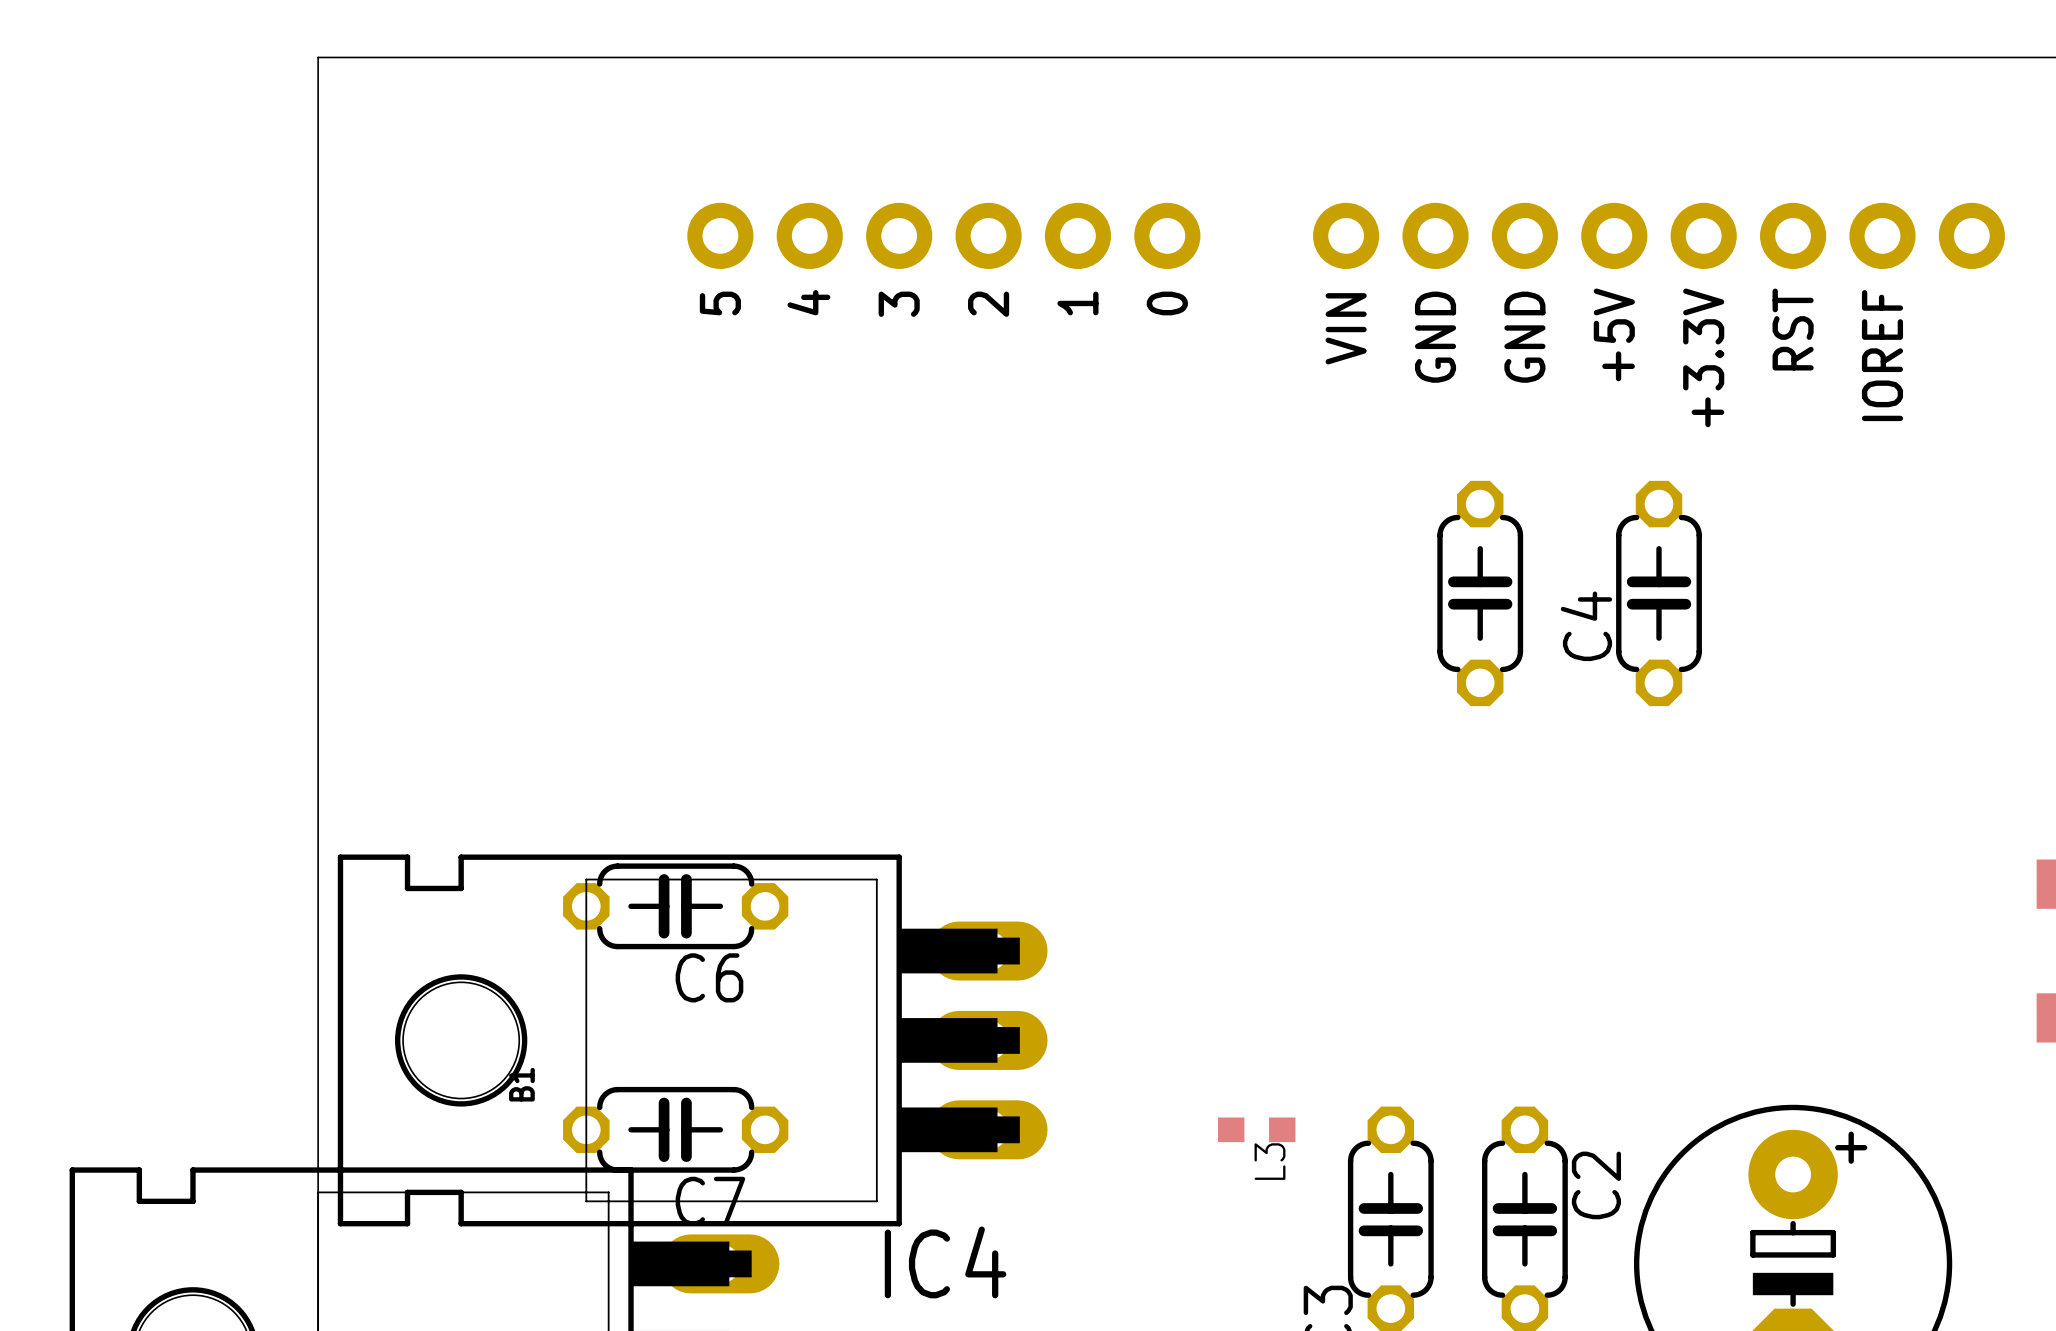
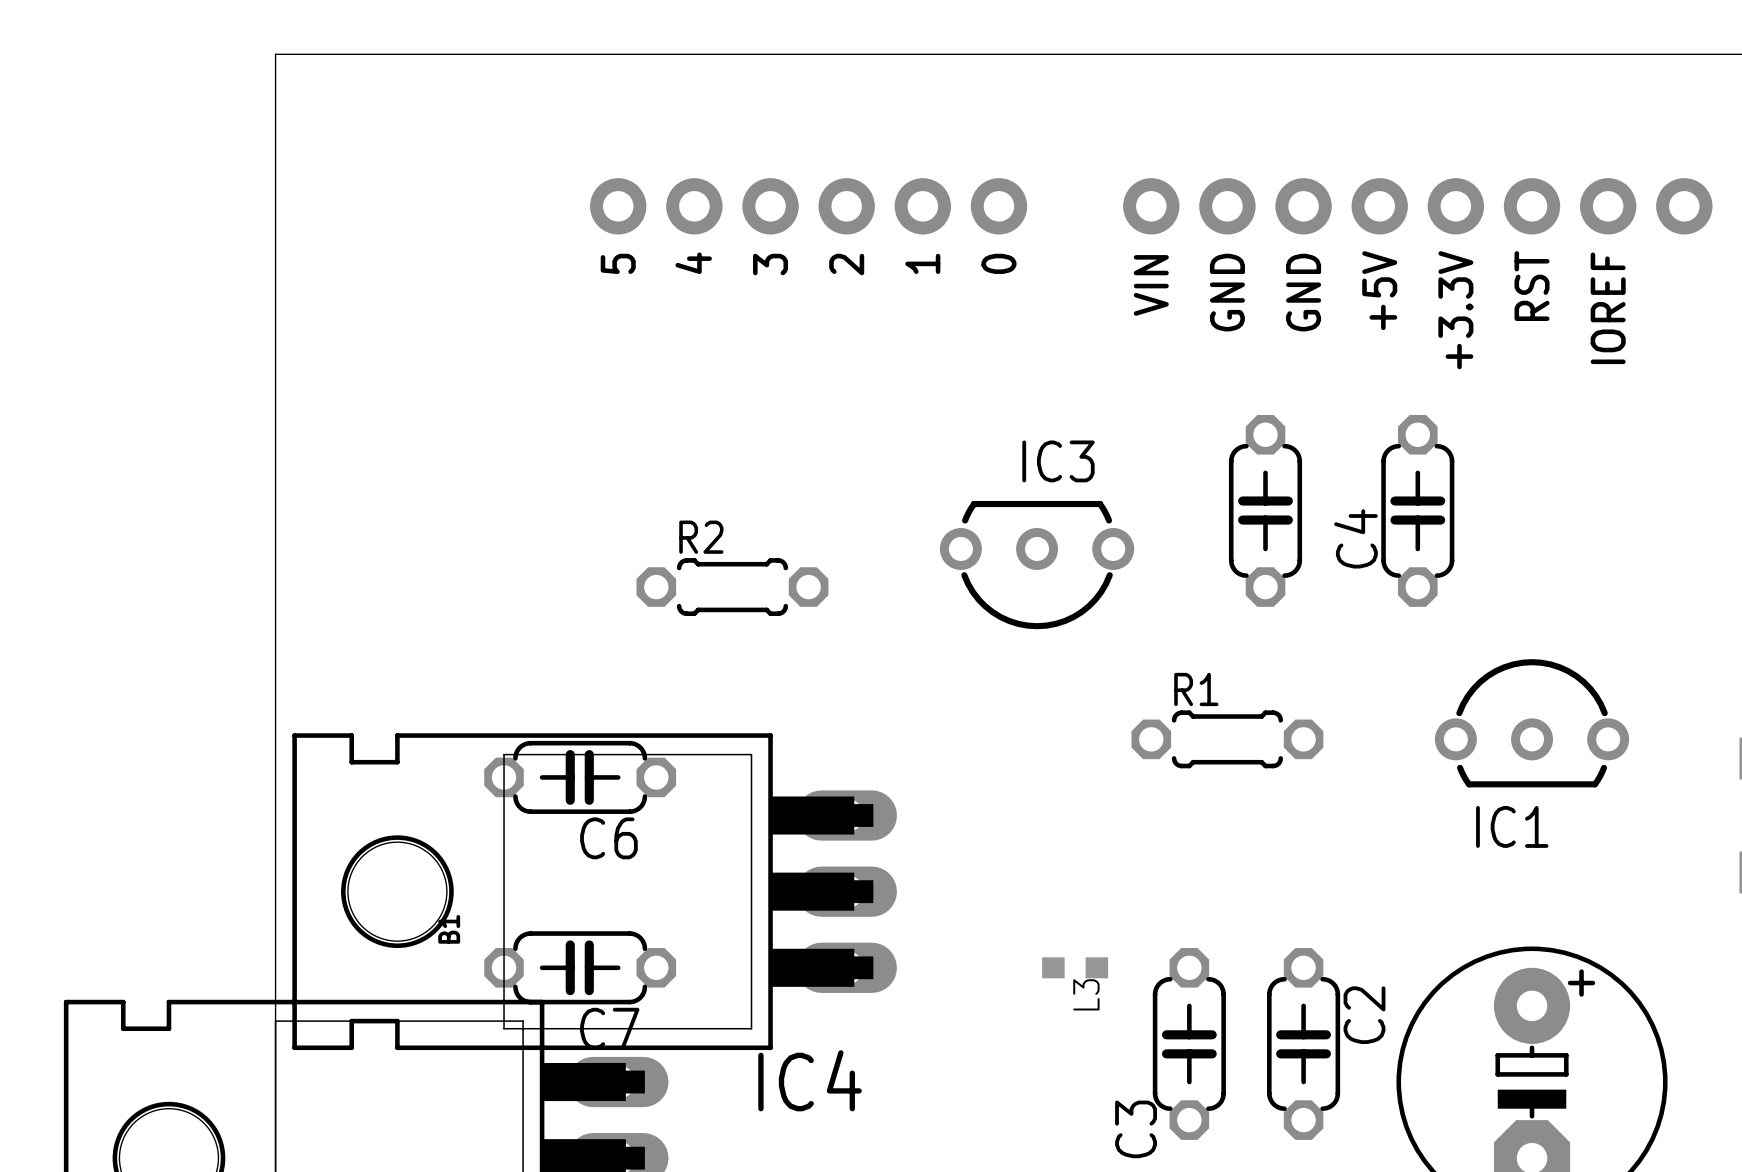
IC3: none -> (1037, 565)
R2: none -> (732, 587)
IC1: none -> (1532, 723)
R1: none -> (1227, 739)

